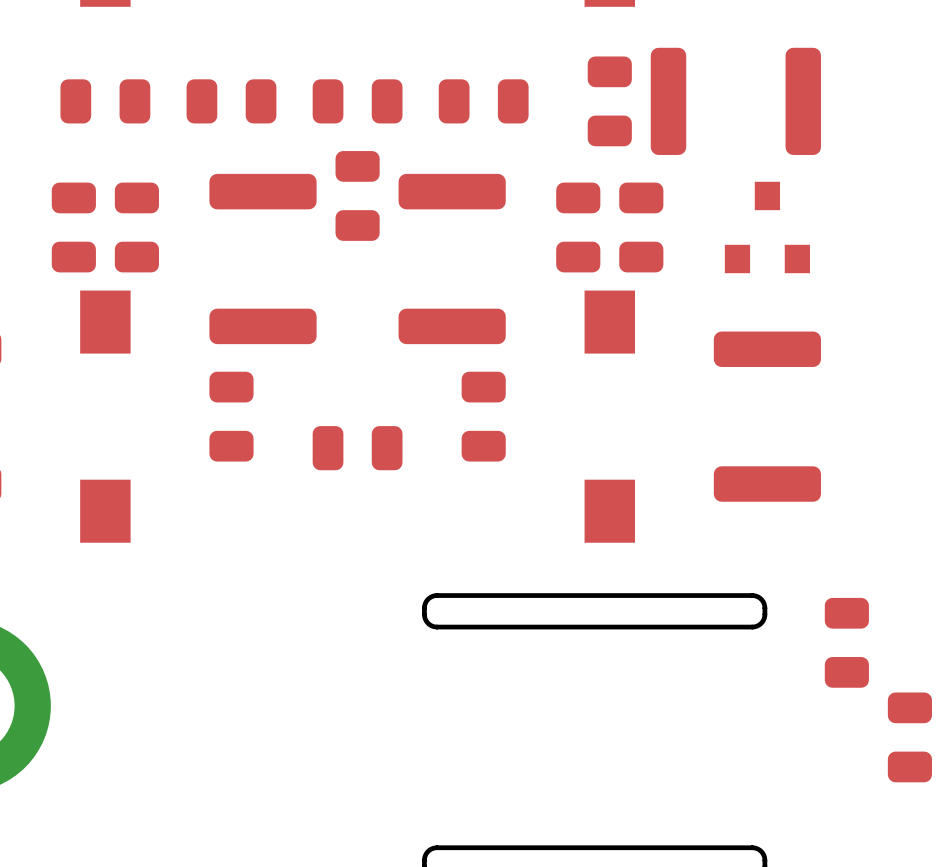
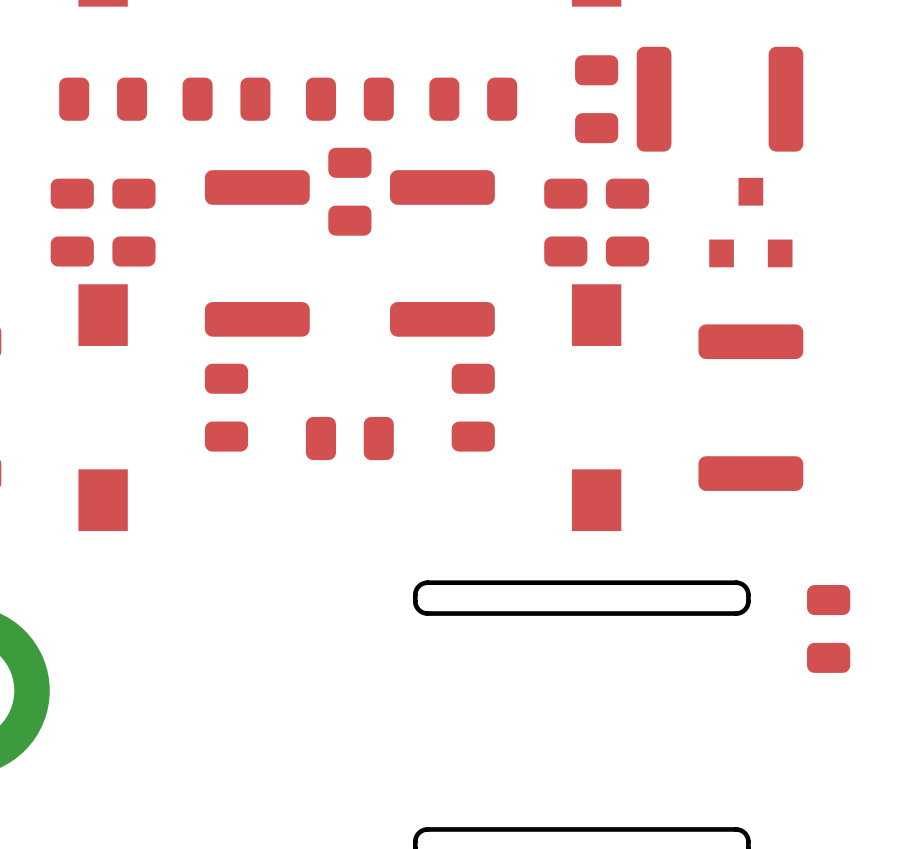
part: (909, 737) -> none

